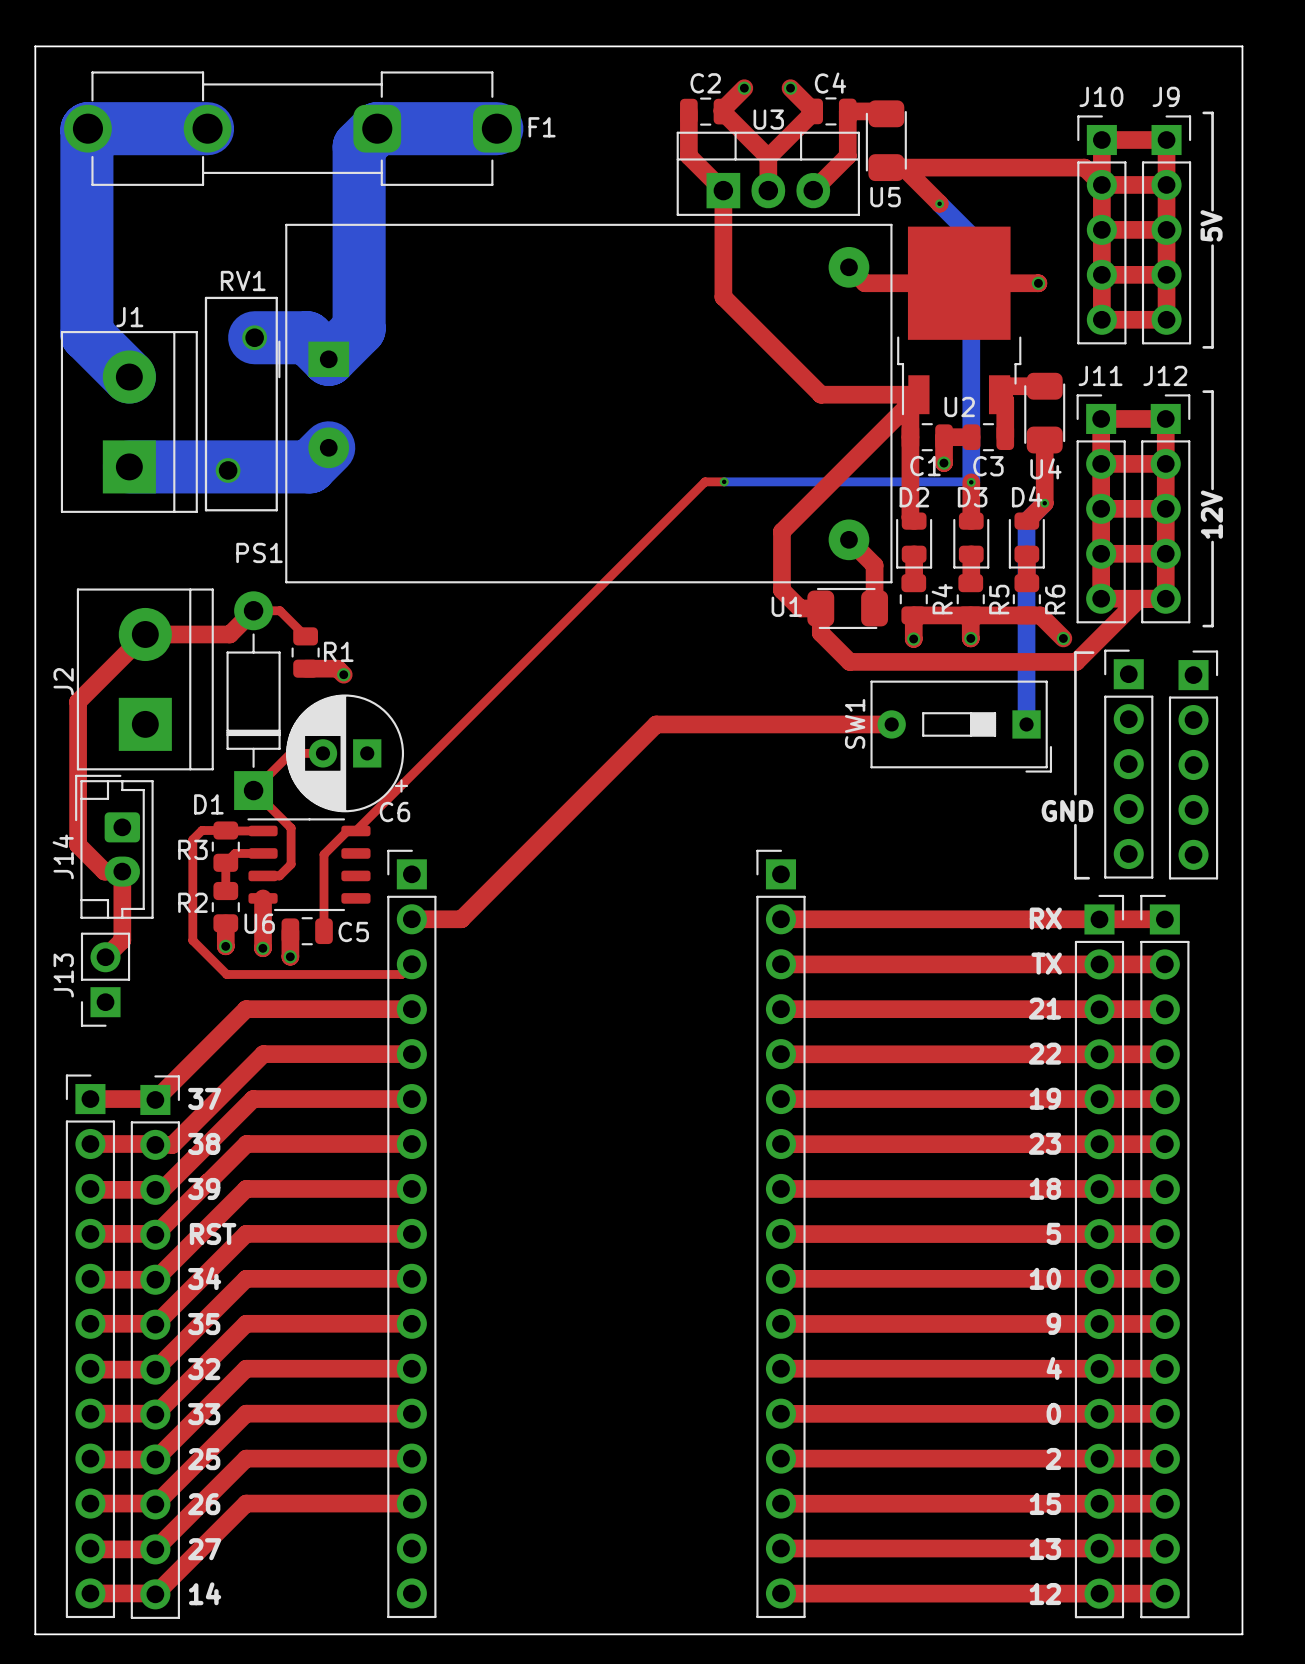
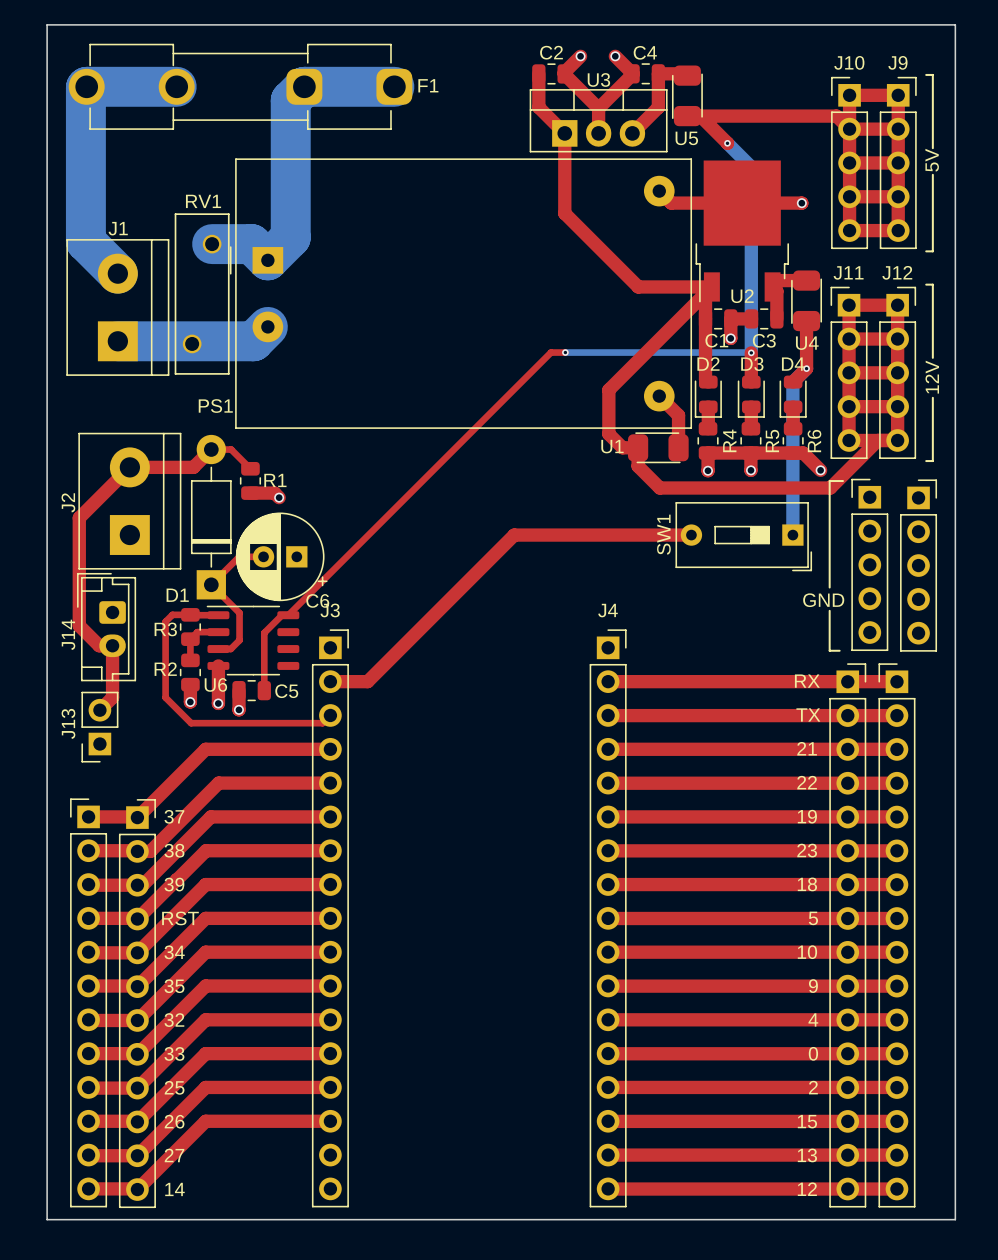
part: (411, 1233) -> none
J3: none -> (330, 918)
part: (780, 1233) -> none
J4: none -> (608, 918)

